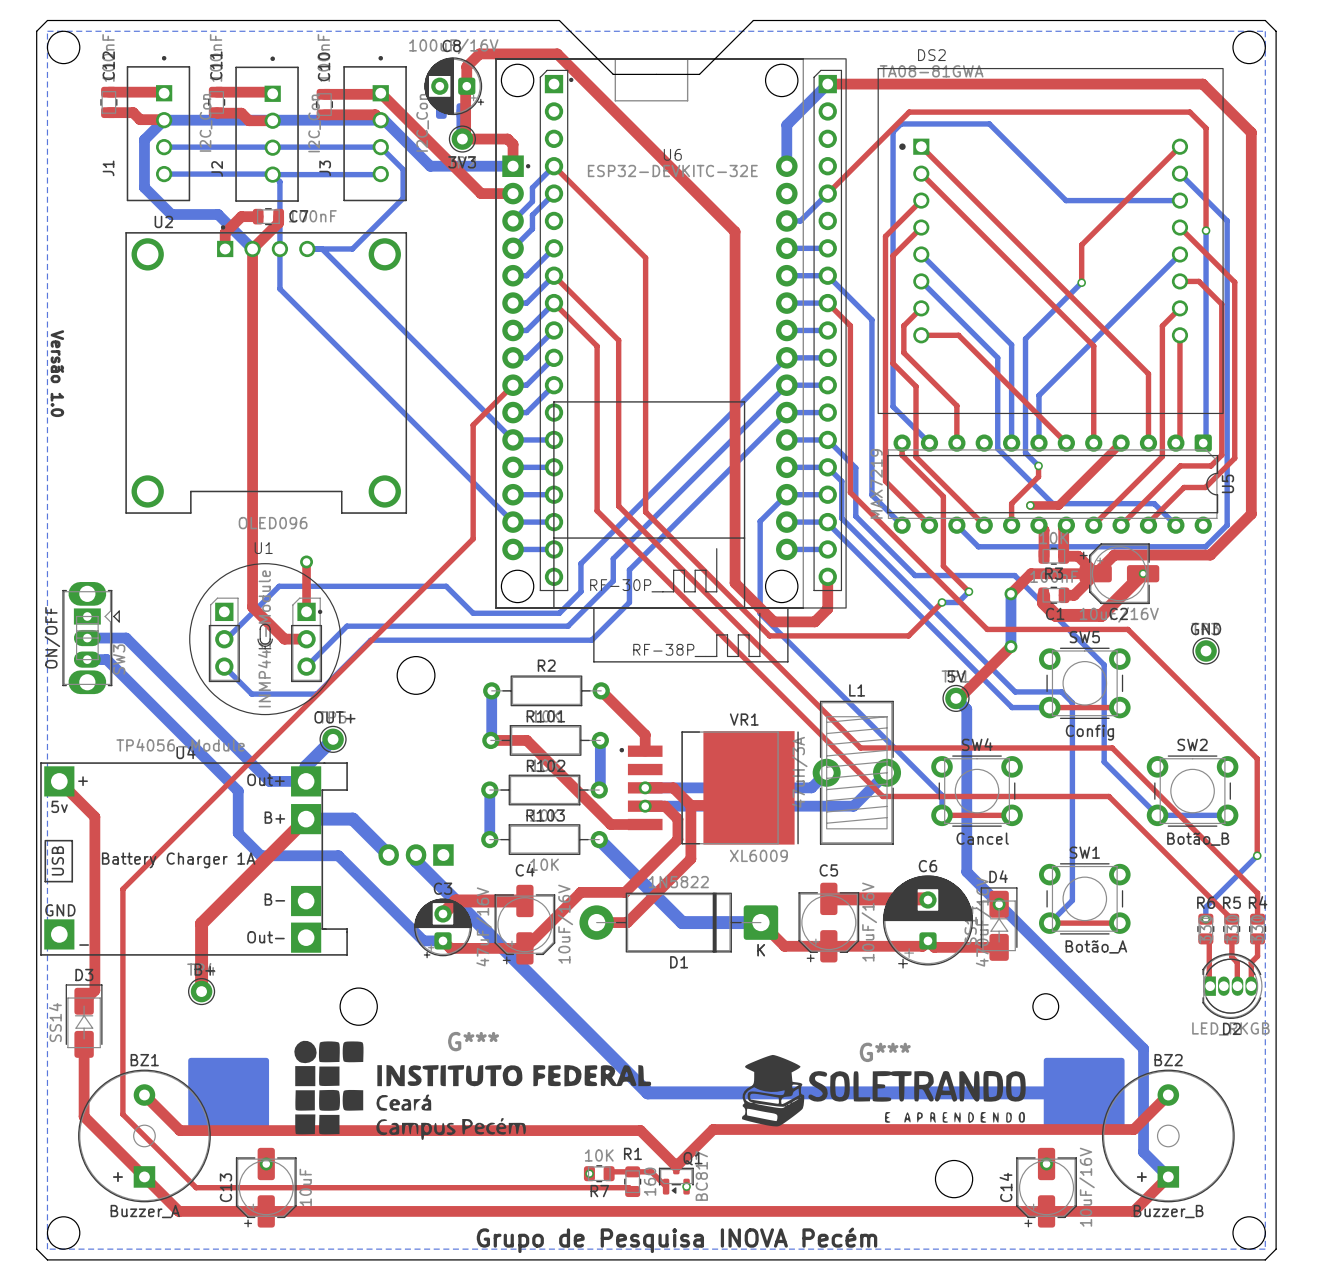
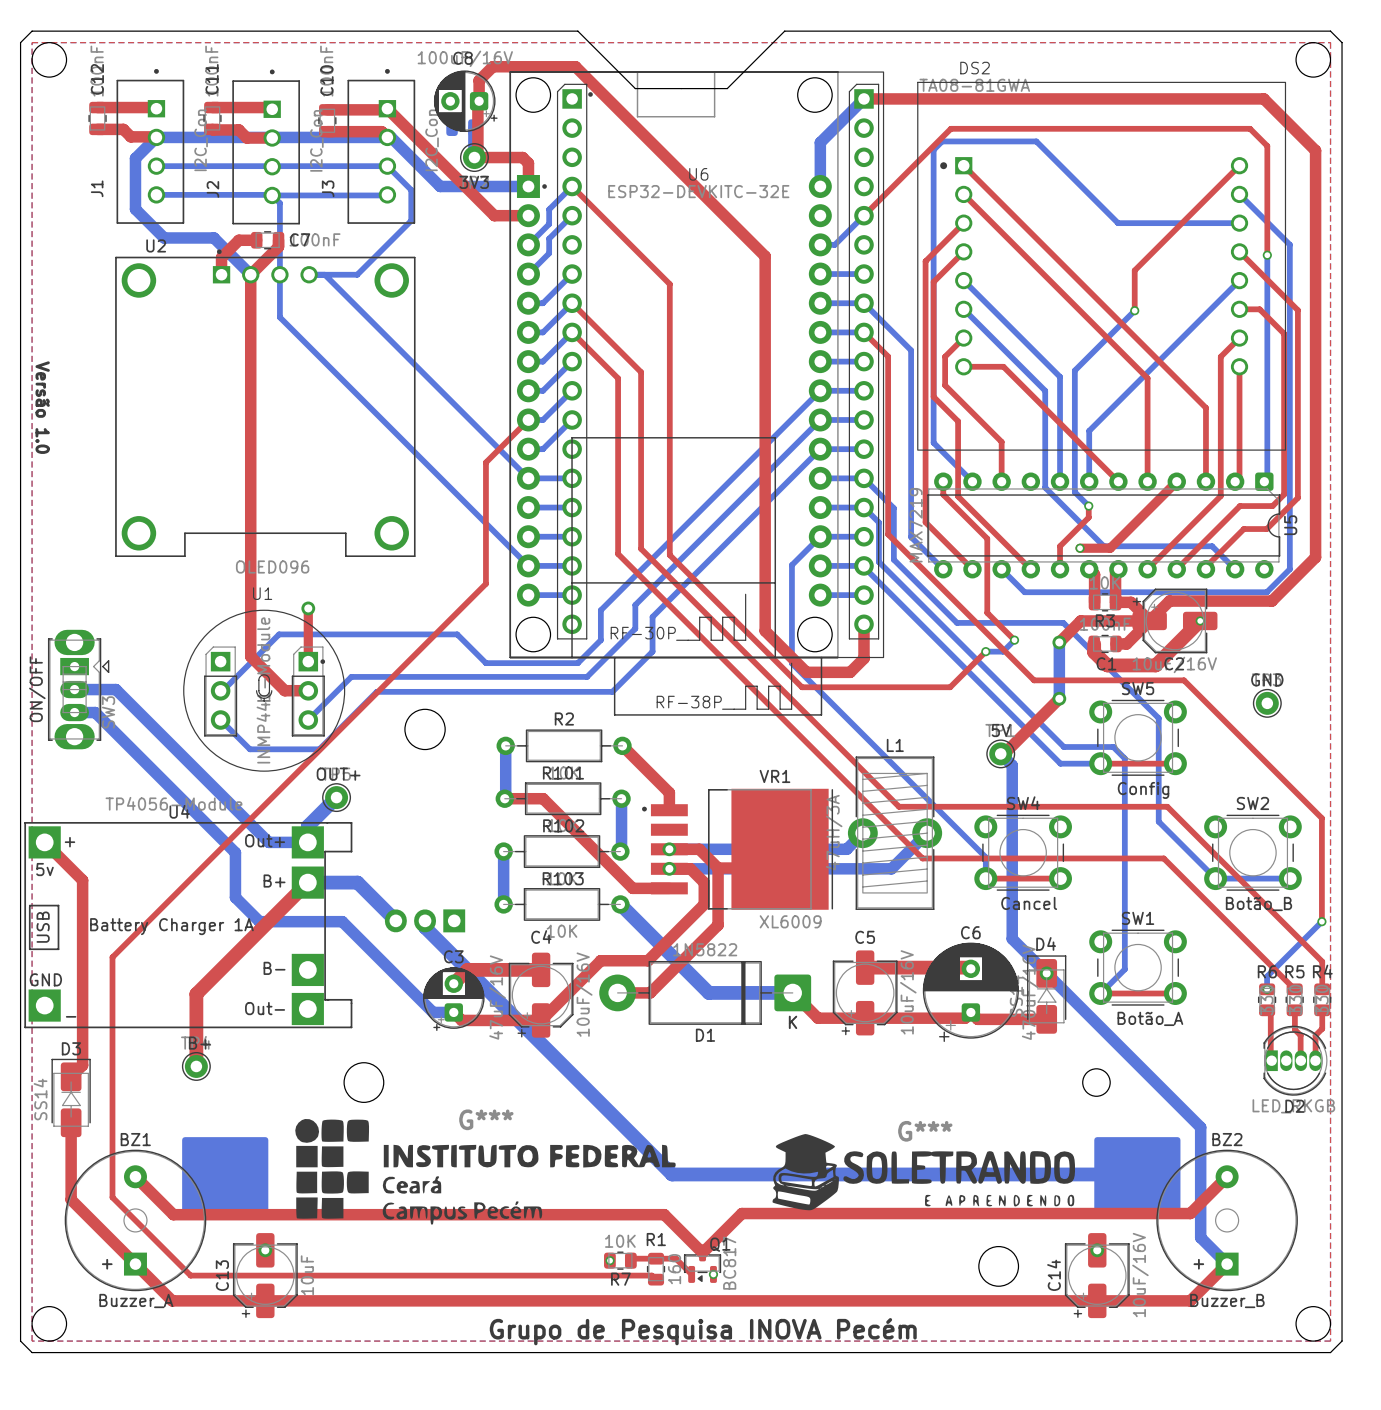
top zone outline: none -> (32, 42) (1330, 42) (1330, 1341) (32, 1341) (32, 42)

